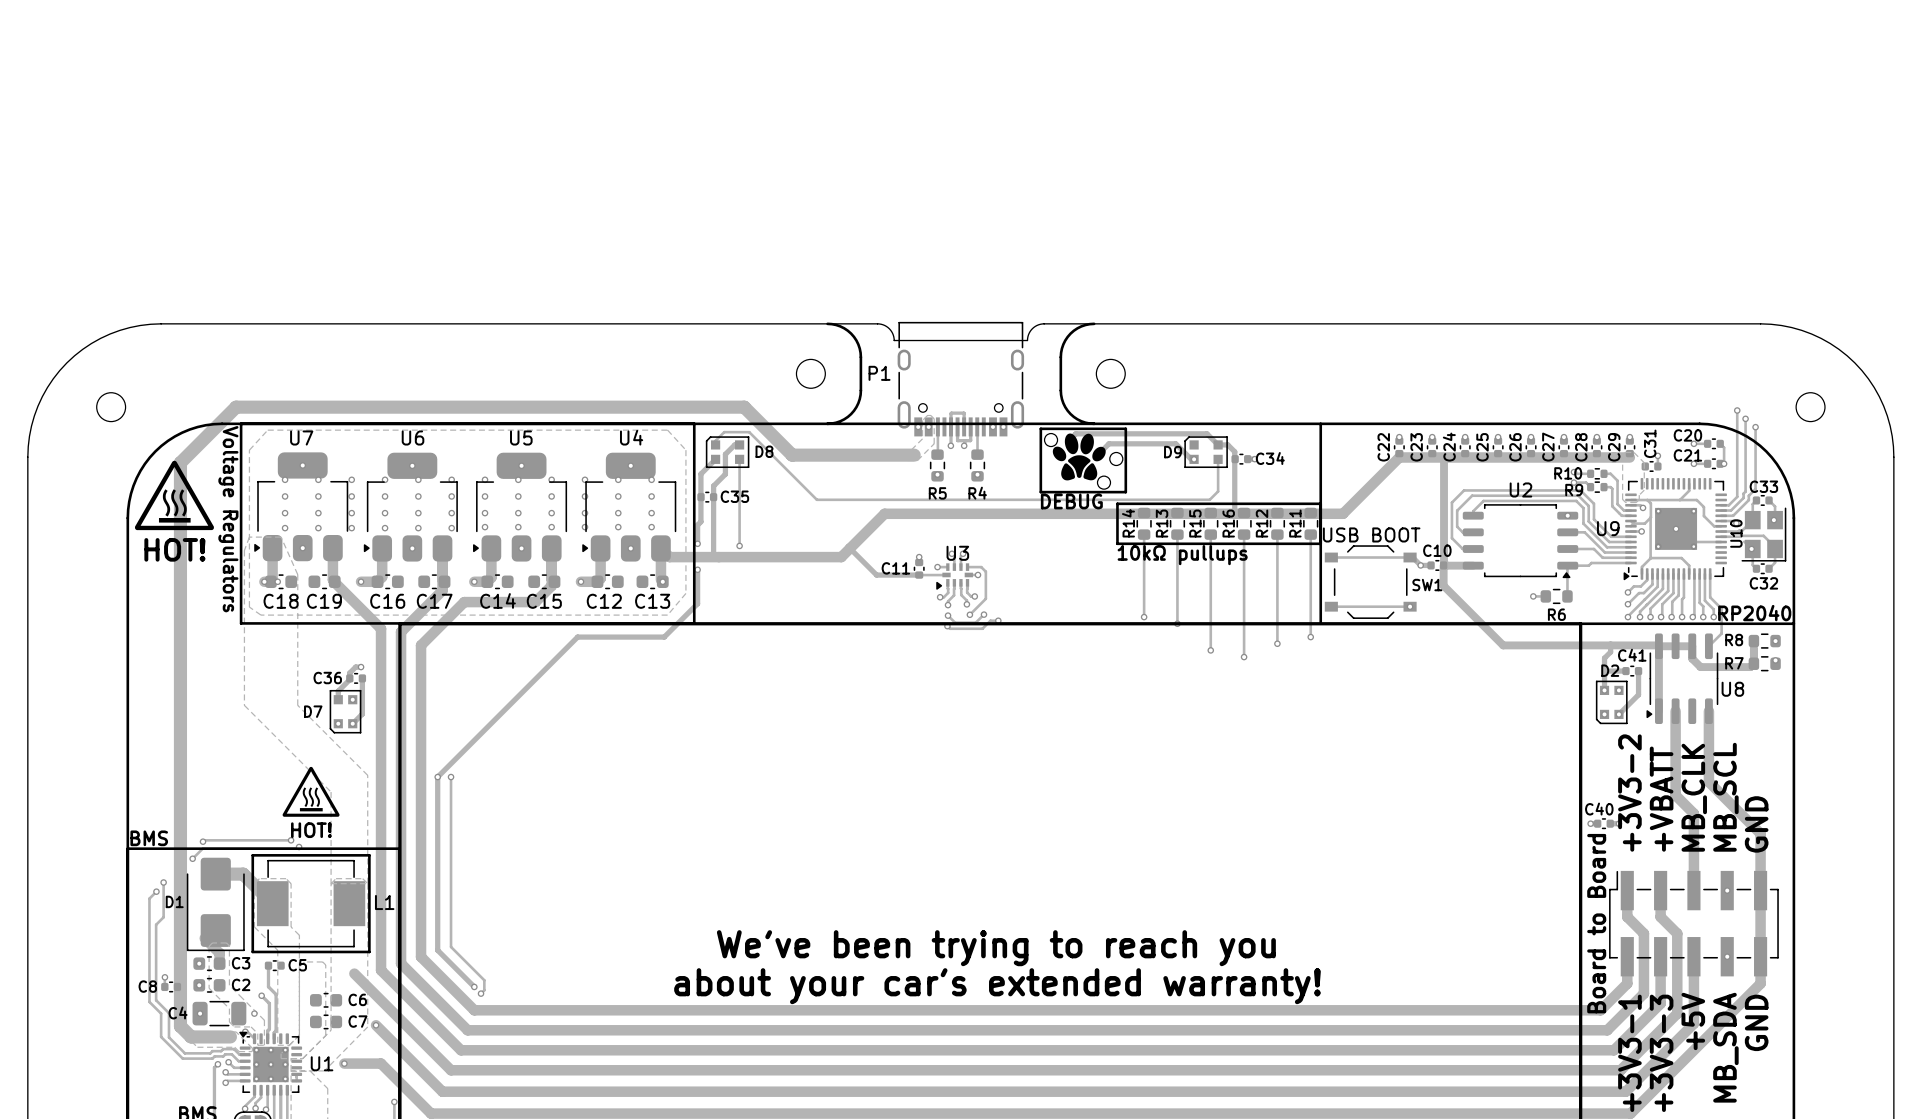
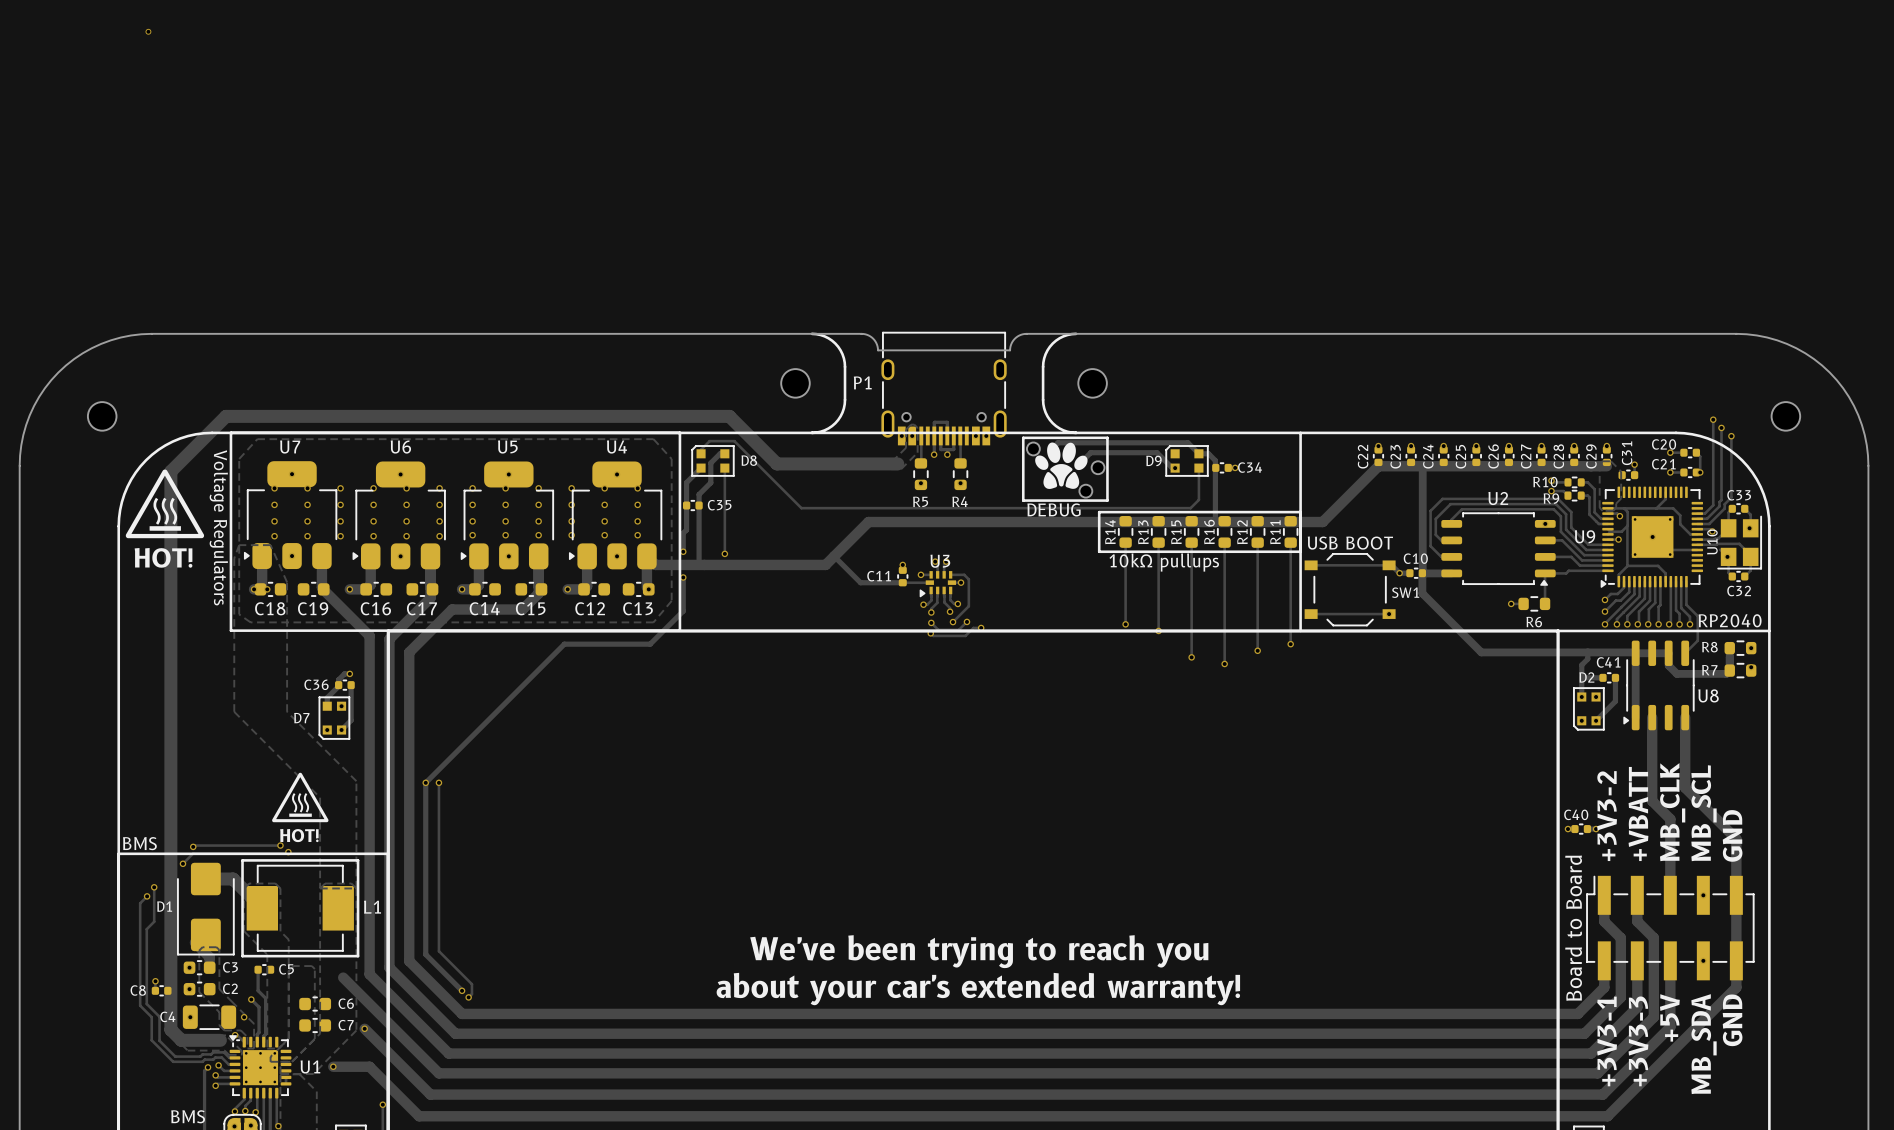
via: none -> (148, 31)

